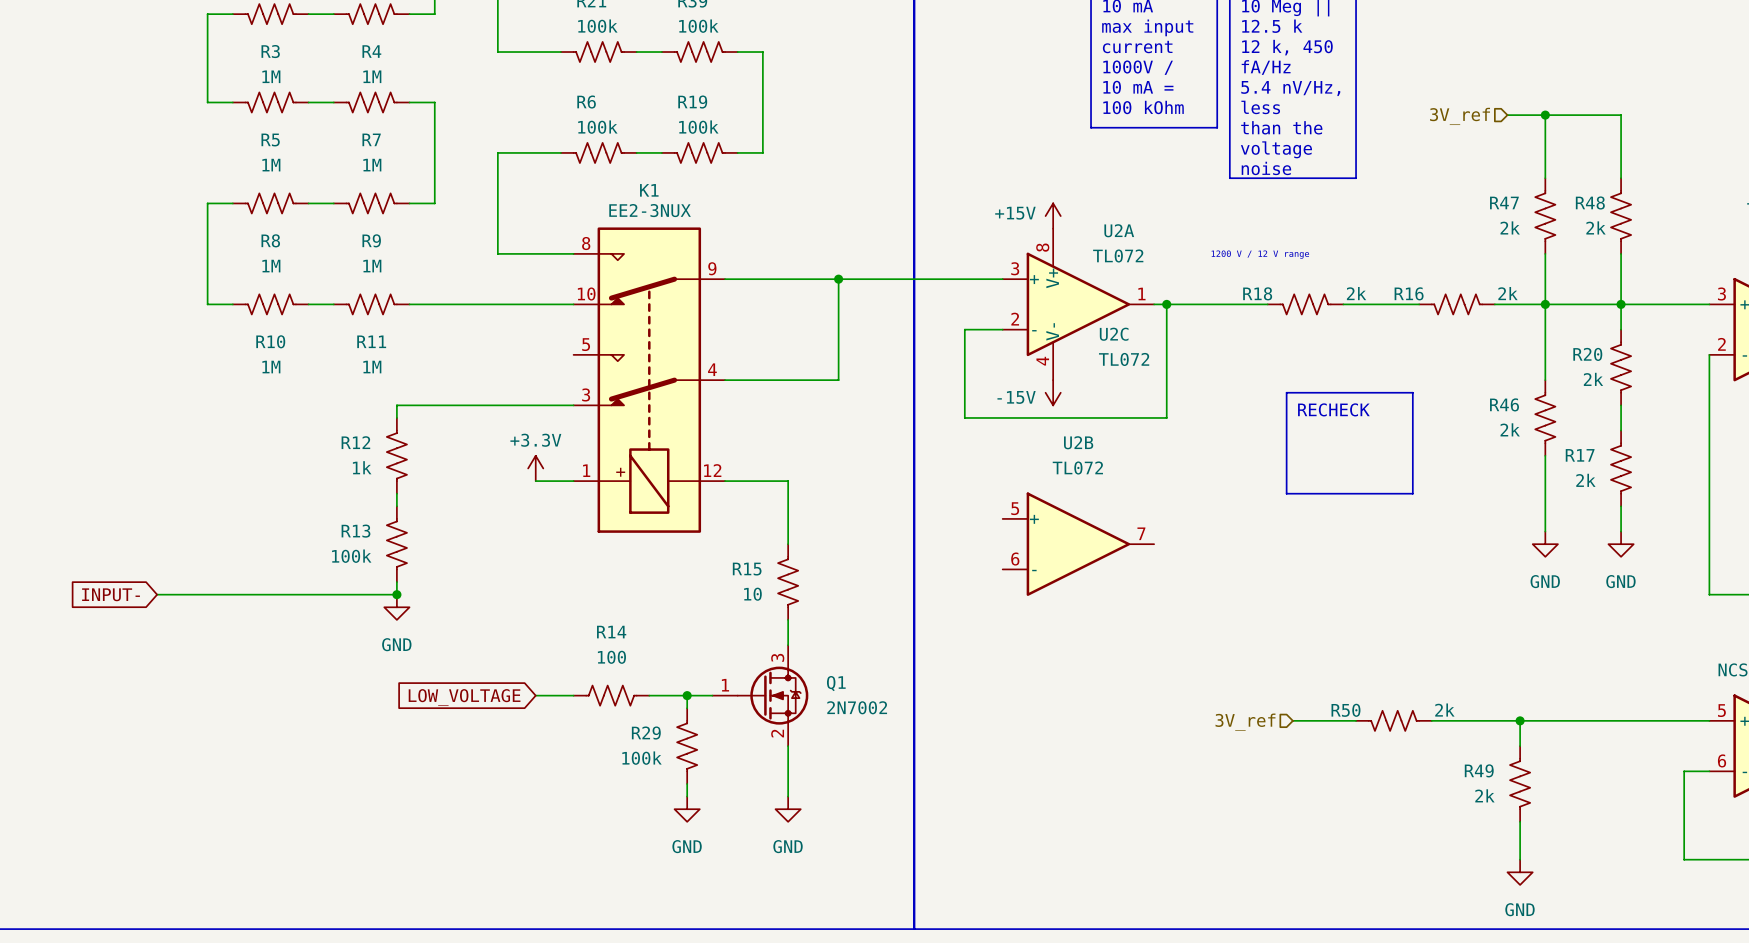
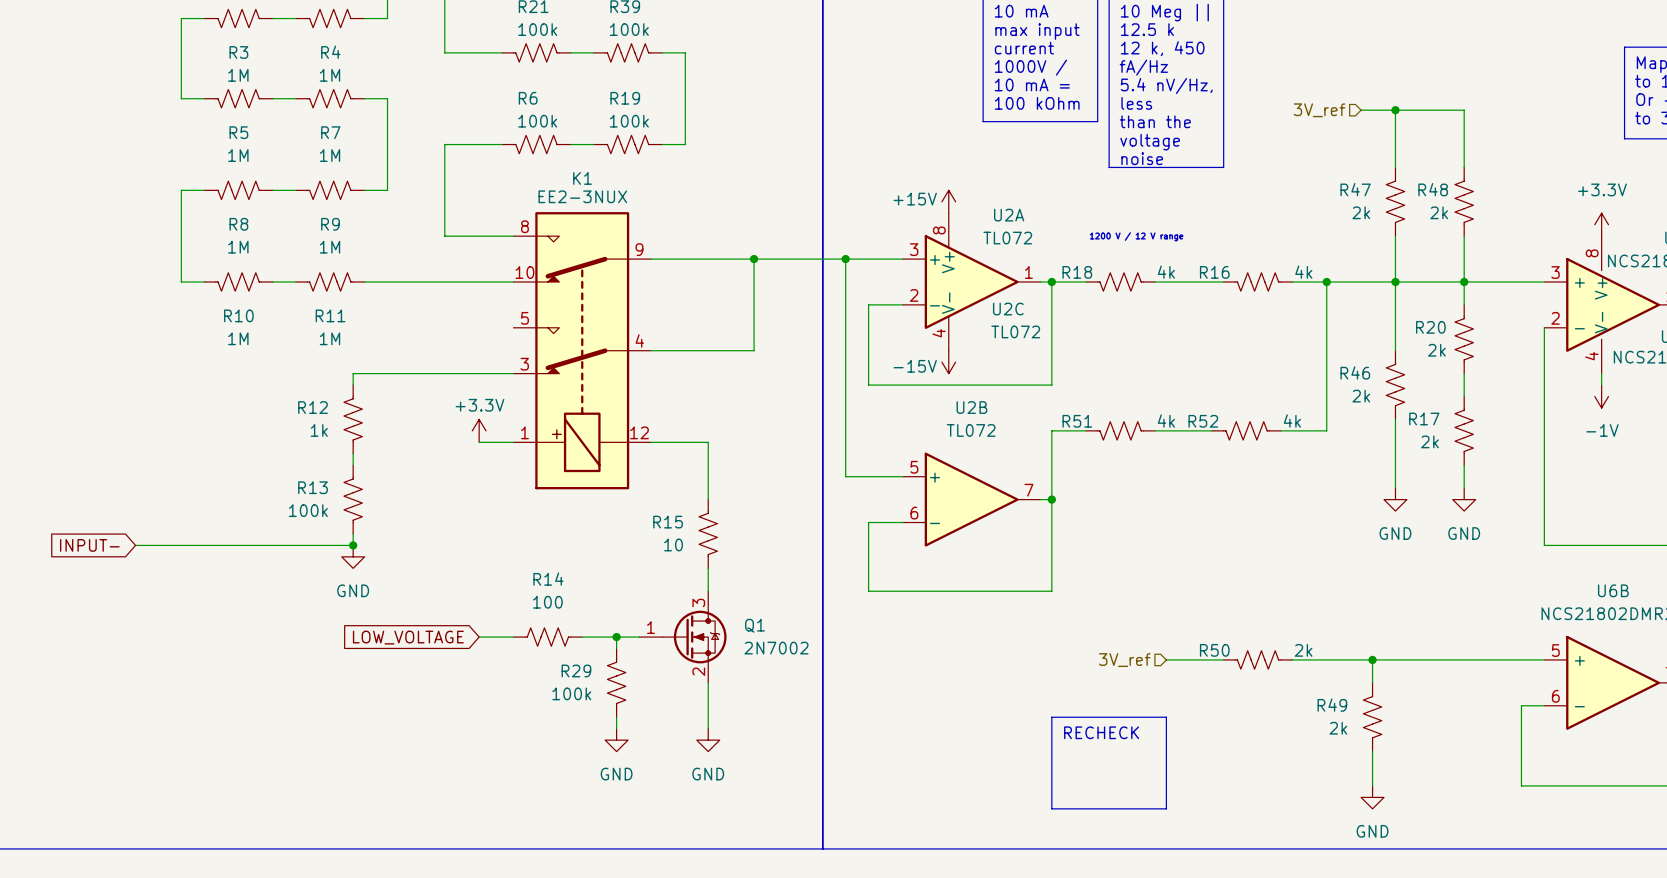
wire: none -> (845, 259) (845, 476) (902, 476)
junction: none -> (845, 259)
R18 value: 2k (1356, 293) -> 4k (1166, 272)
R16 value: 2k (1507, 293) -> 4k (1303, 272)
wire: (1204, 304) (1267, 304) -> (1154, 281) (1212, 281)
R18 position: (1305, 304) -> (1120, 281)
wire: (1356, 304) (1419, 304) -> (1292, 281) (1349, 281)
R16 position: (1456, 304) -> (1258, 281)
wire: none -> (1326, 281) (1326, 430) (1280, 430)
junction: none -> (1326, 281)
line: (1286, 392) (1412, 392) (1412, 493) (1286, 493) (1286, 392) -> none
text: RECHECK (1333, 409) -> none
wire: none -> (1086, 430) (1051, 430) (1051, 591) (868, 591) (868, 522) (902, 522)
R51: none -> 4k (1120, 430)
wire: none -> (1154, 430) (1212, 430)
R52: none -> 4k (1246, 430)
wire: none -> (1040, 499) (1051, 499)
junction: none -> (1051, 499)
line: none -> (1051, 717) (1166, 717) (1166, 808) (1051, 808) (1051, 717)
text: none -> RECHECK (1101, 732)

